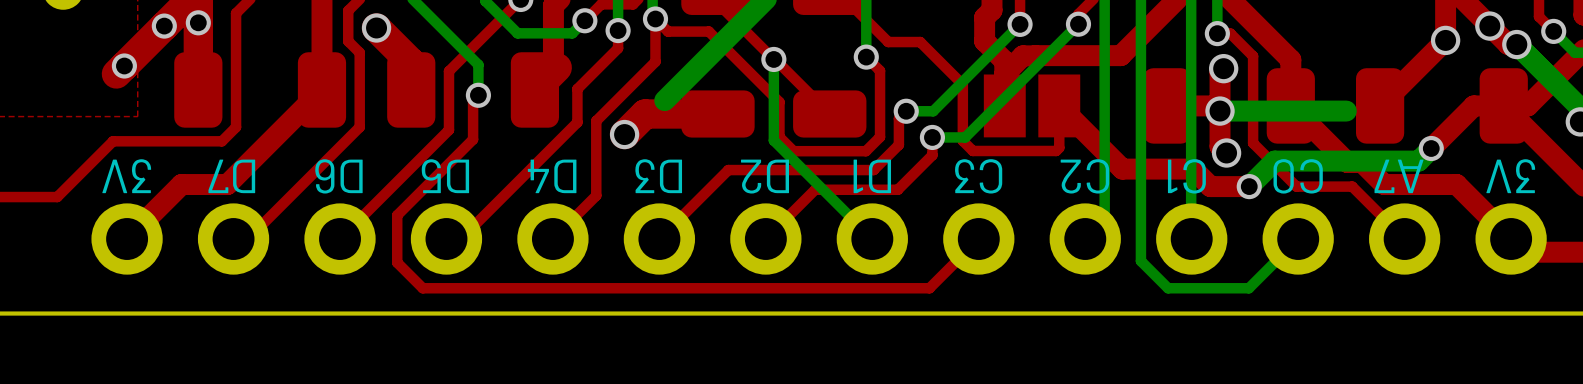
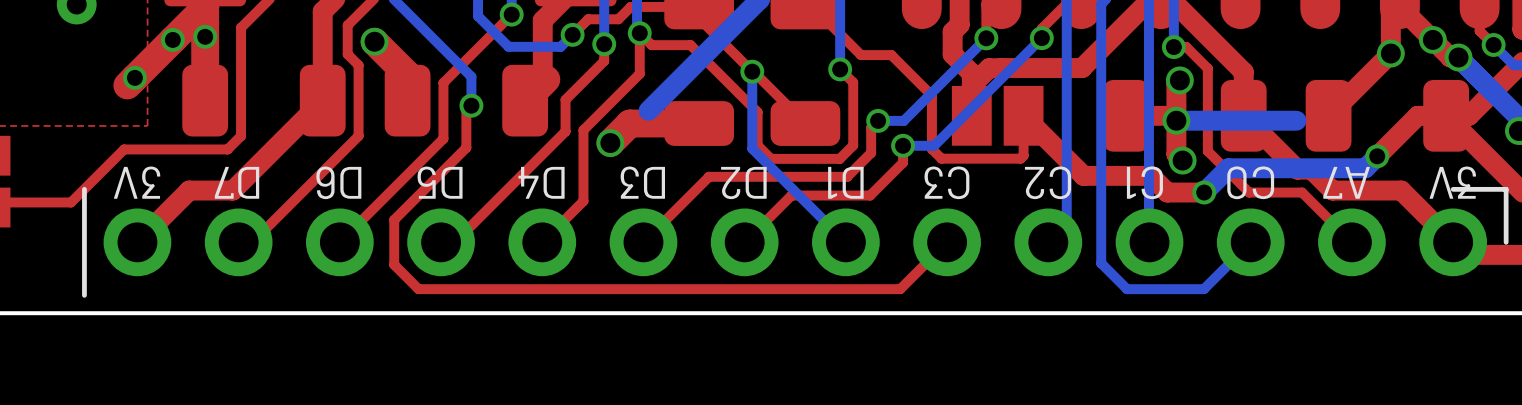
part side: top (819, 239) -> bottom (795, 242)

